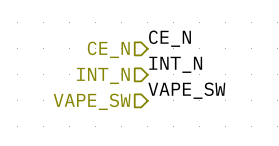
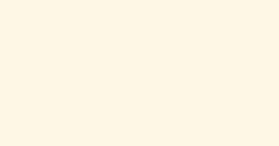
label: CE_N (169, 38) -> none
hierarchical label: CE_N (108, 49) -> none
label: INT_N (175, 64) -> none
hierarchical label: INT_N (103, 75) -> none
label: VAPE_SW (186, 90) -> none
hierarchical label: VAPE_SW (92, 101) -> none

